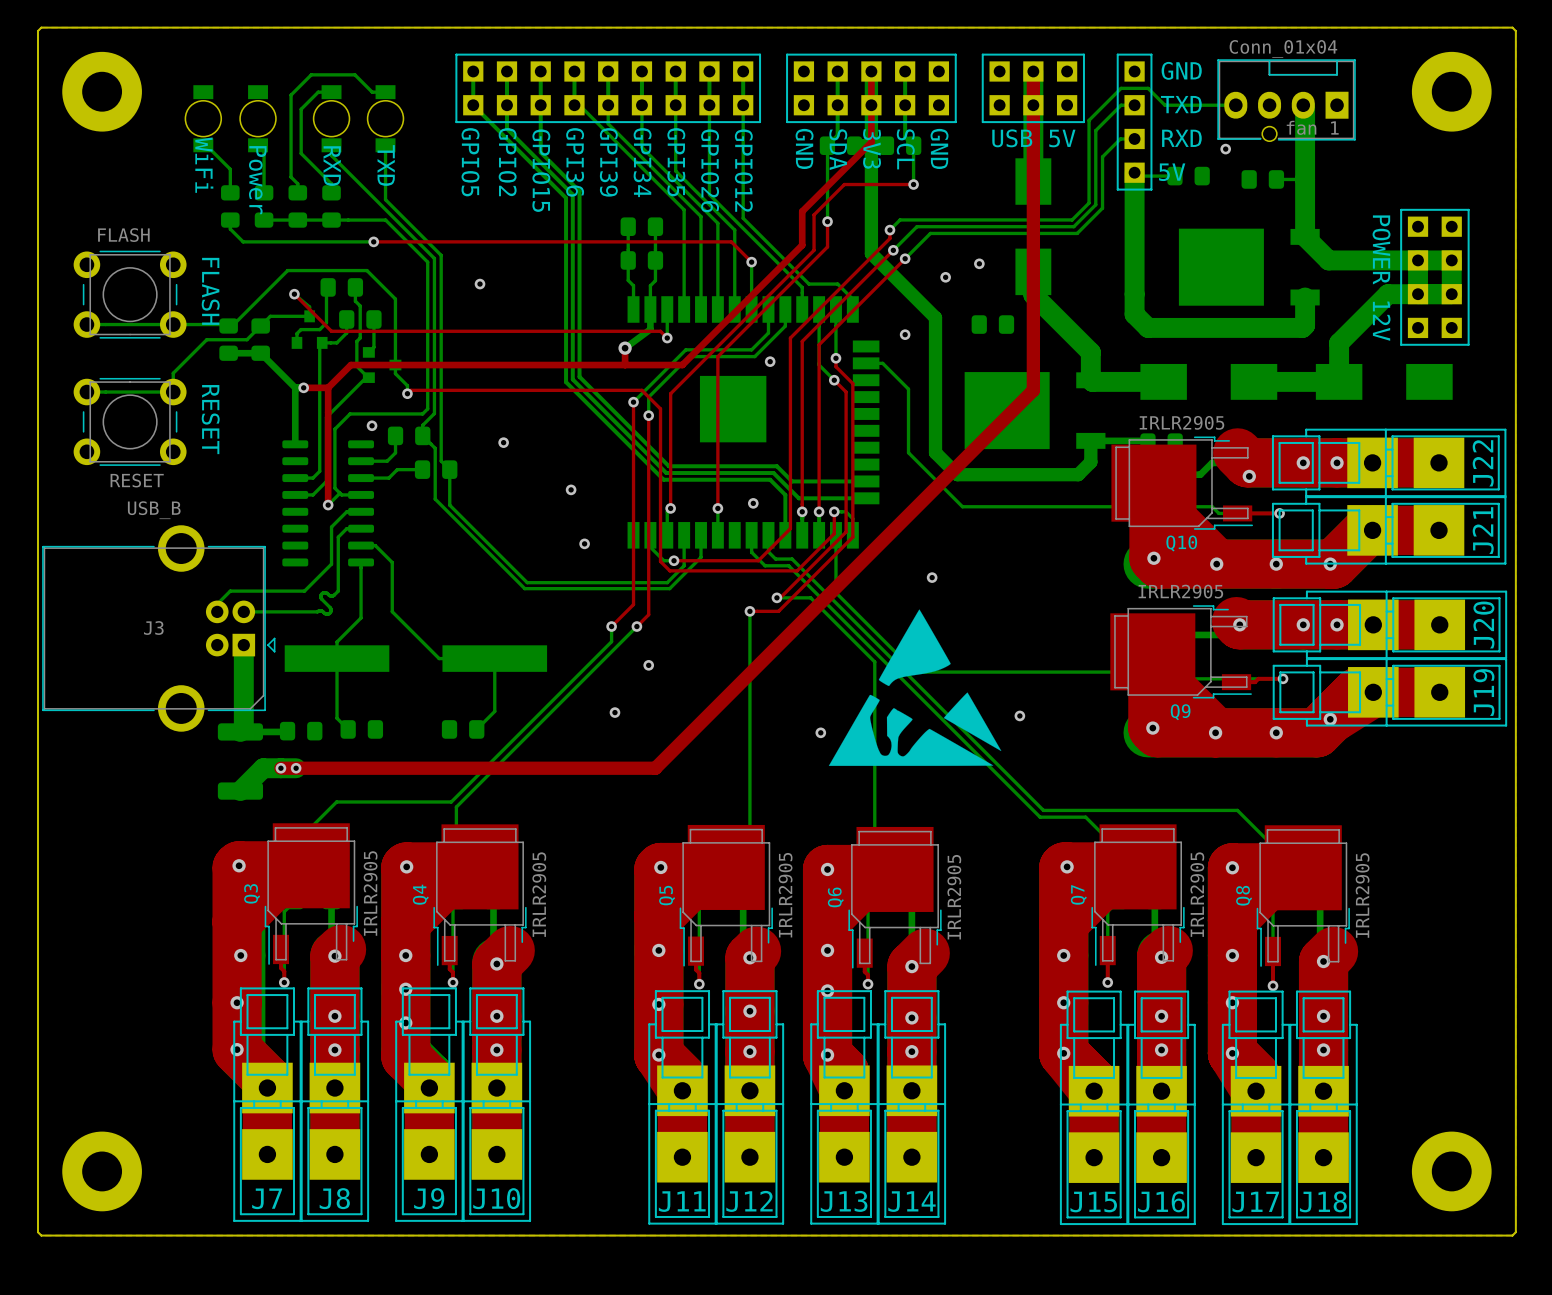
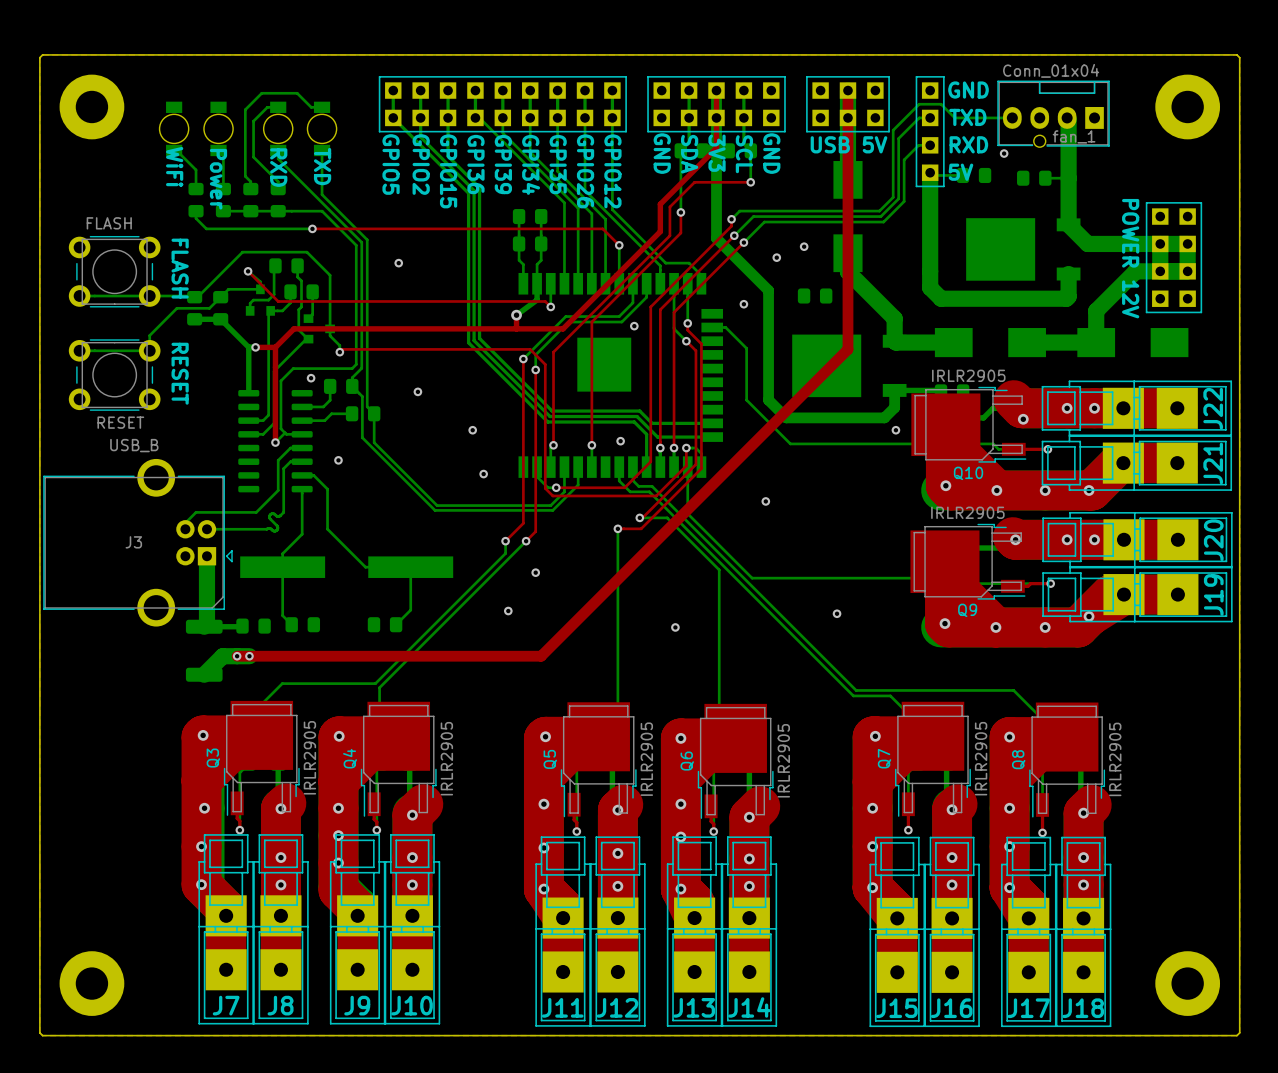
via: none -> (895, 430)
via: none -> (338, 460)
drawing: [828, 609, 1002, 766] -> none

